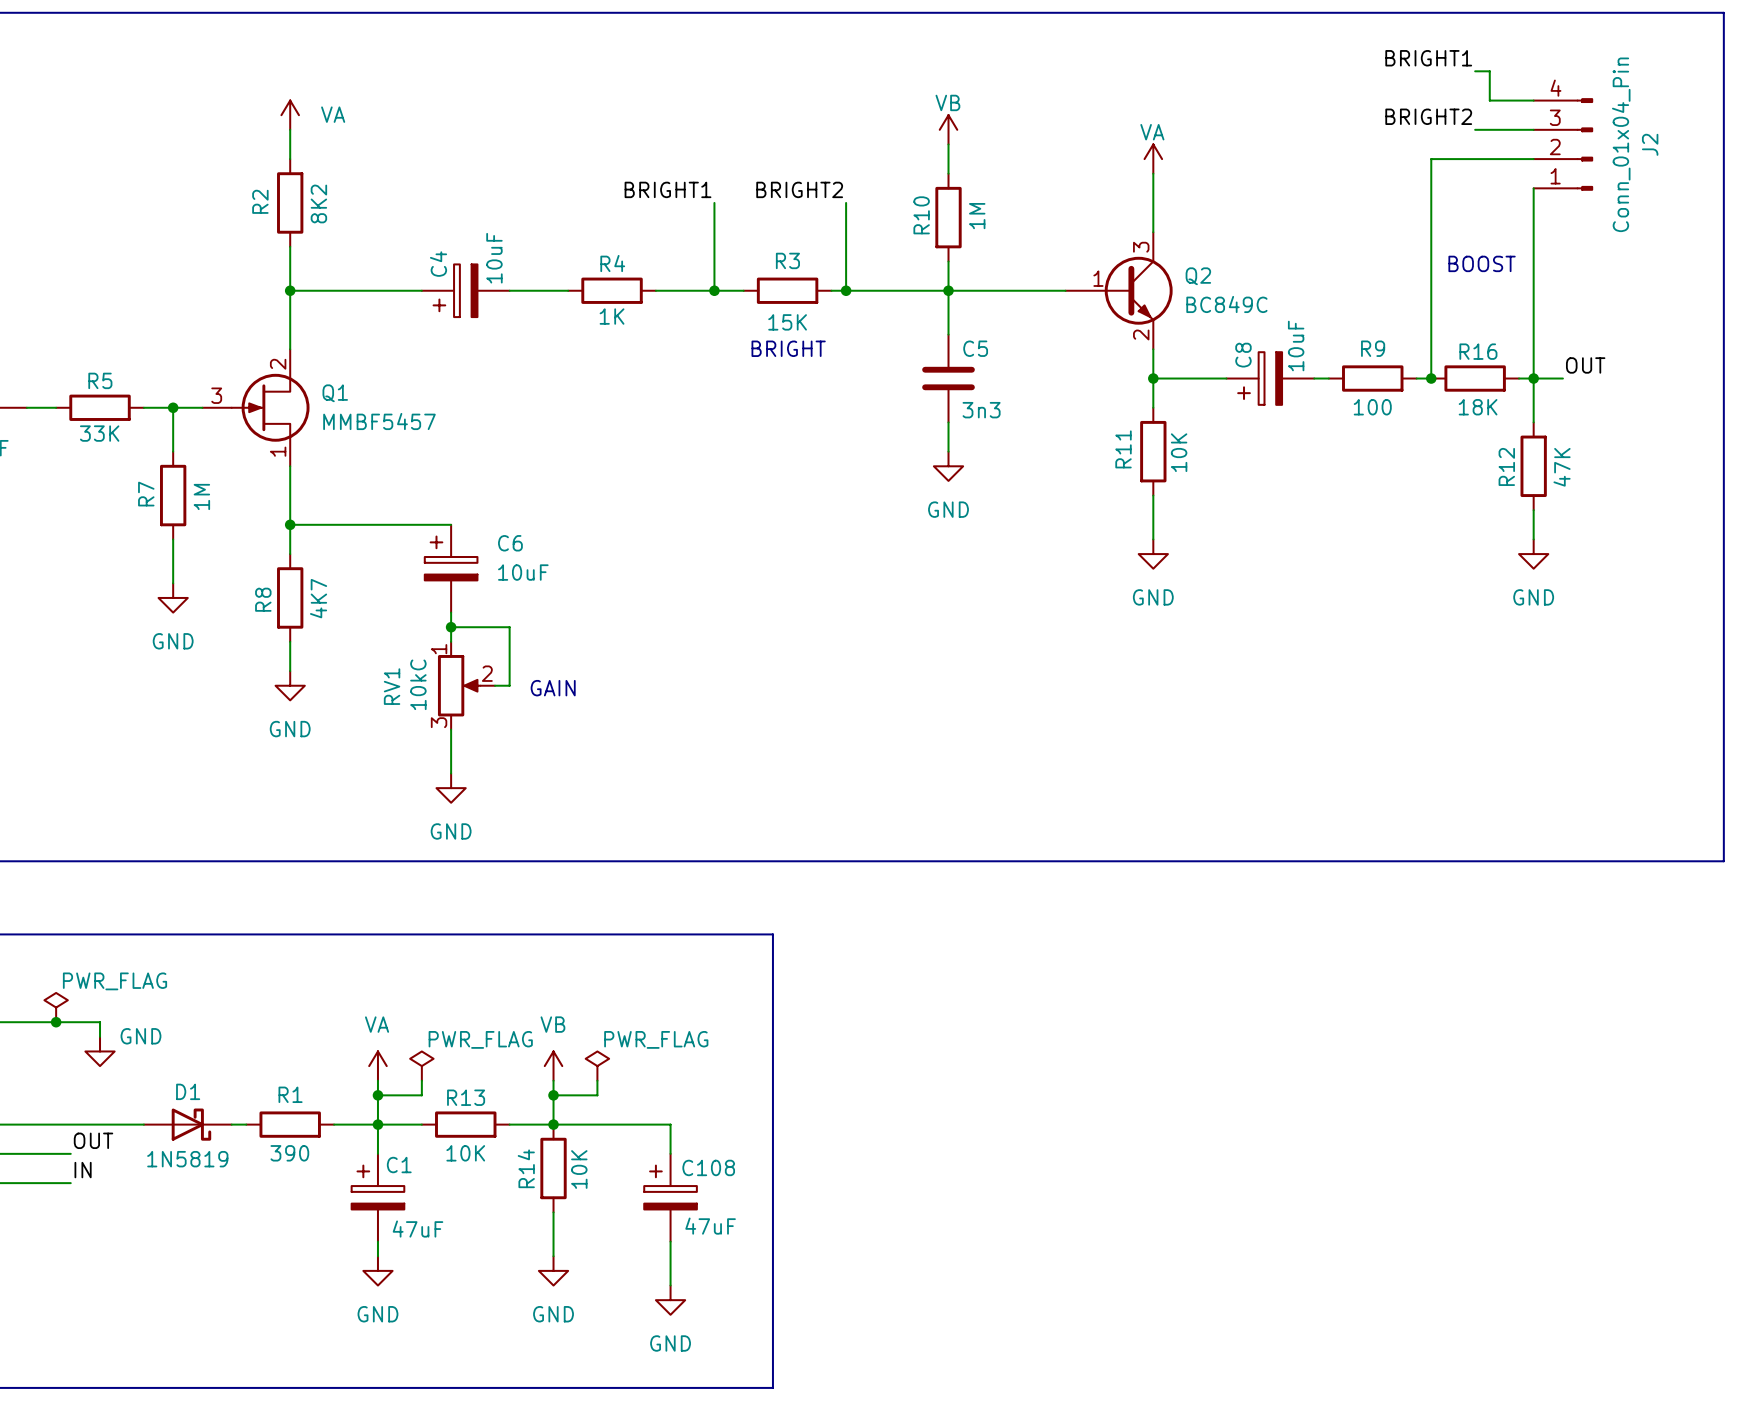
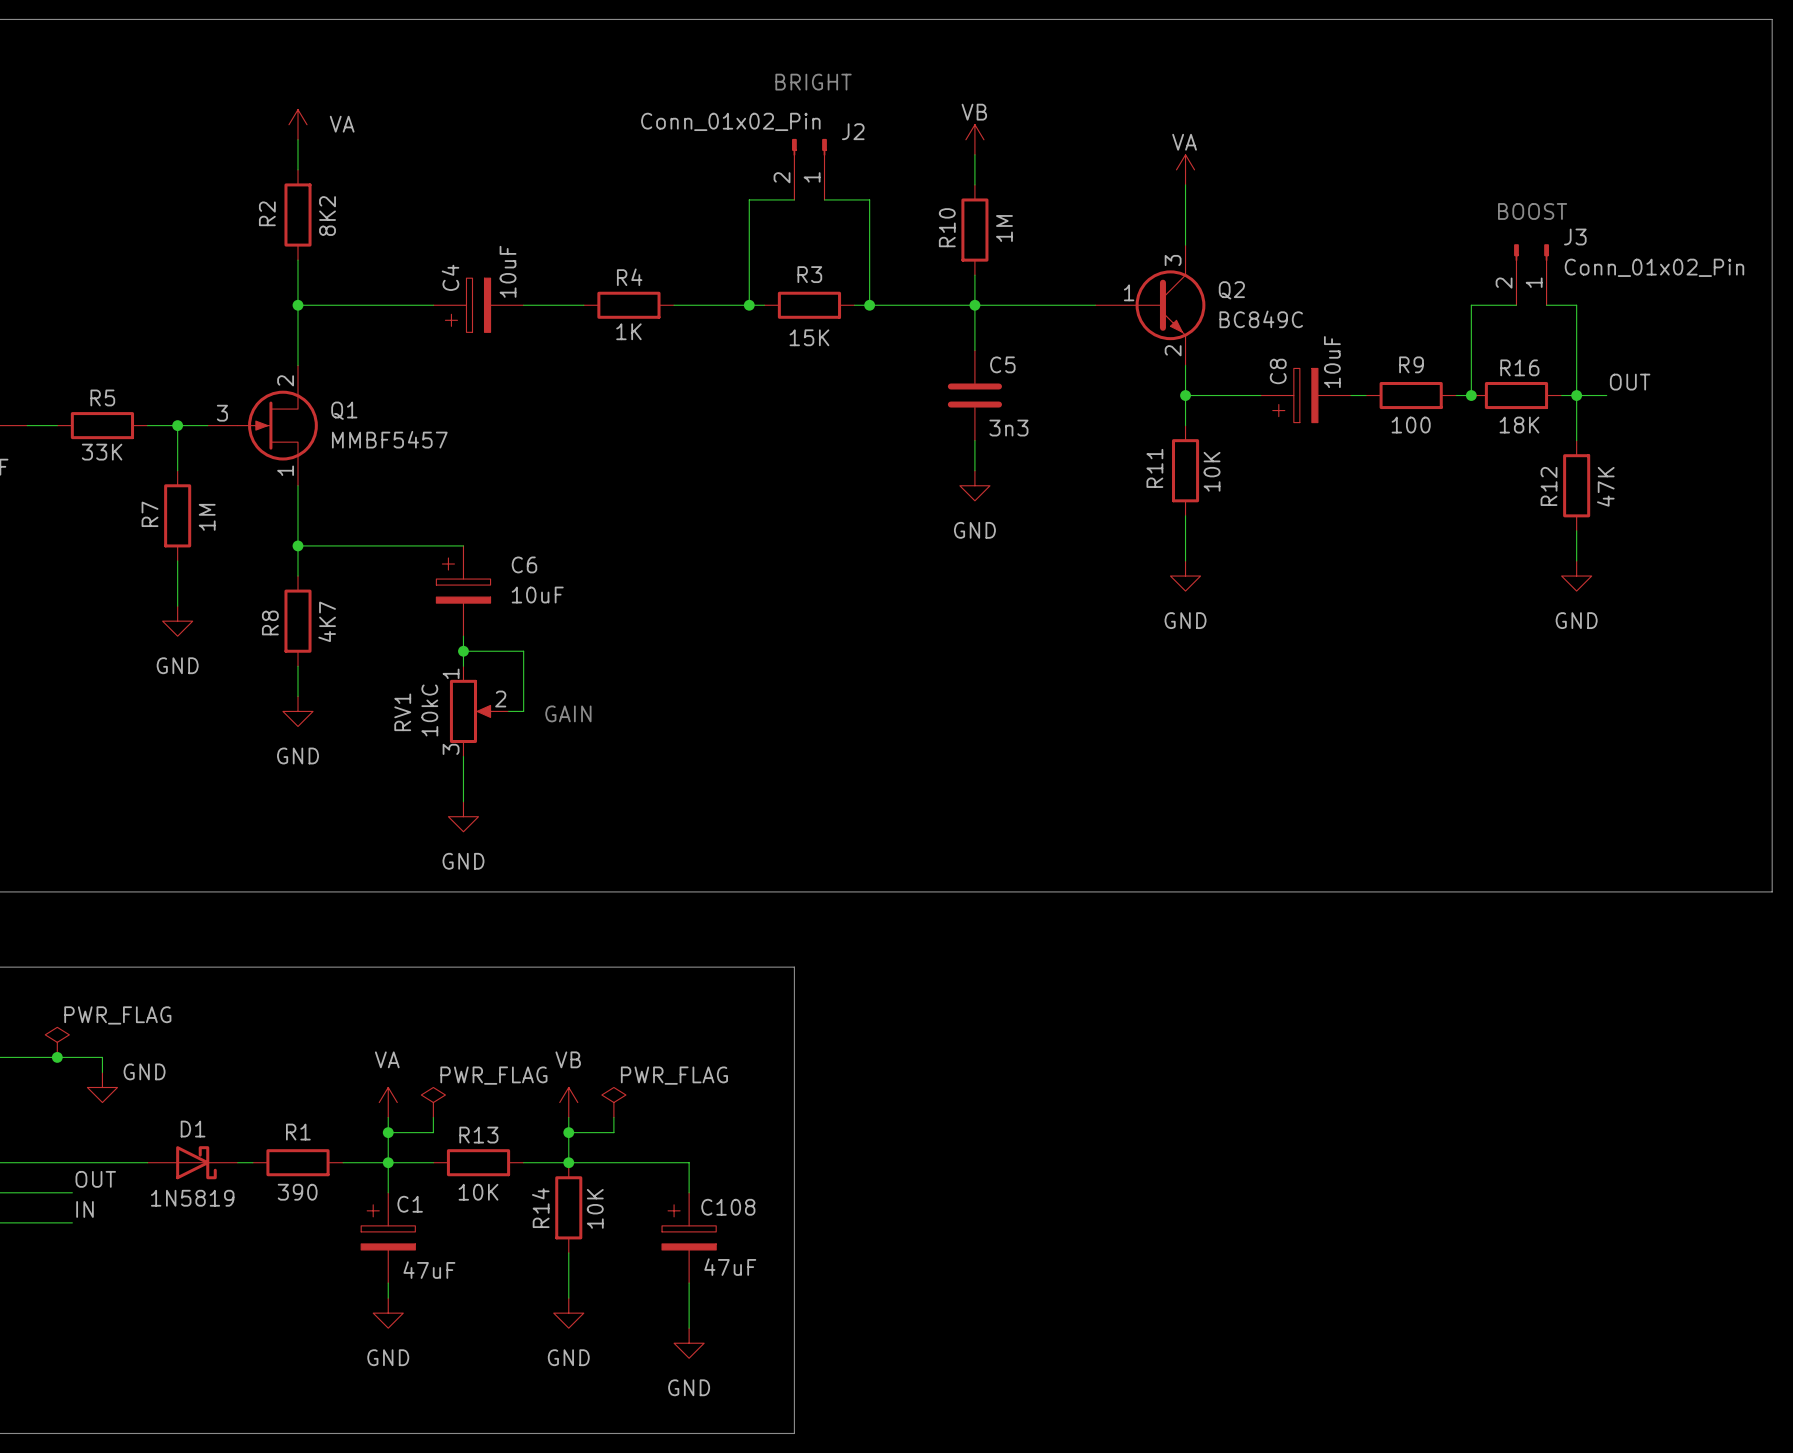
label: BRIGHT1 (1428, 58) -> none
wire: (1475, 71) (1489, 71) (1489, 100) (1533, 100) -> none
J2 symbol: [1533, 98, 1594, 191] -> [792, 138, 827, 200]
label: BRIGHT2 (1428, 116) -> none
wire: (1475, 129) (1533, 129) -> none
J2 value: Conn_01x04_Pin (1621, 144) -> Conn_01x02_Pin (730, 121)
J2 name position: J2 (1650, 144) -> J2 (853, 131)
wire: (1533, 159) (1431, 159) (1431, 290) -> (1516, 305) (1471, 305)
wire: none -> (794, 199) (749, 199) (749, 305)
wire: none -> (824, 199) (869, 199) (869, 215)
wire: (1533, 188) (1533, 290) -> (1546, 305) (1576, 305)
label: BRIGHT1 (668, 189) -> none
label: BRIGHT2 (799, 189) -> none
wire: (714, 202) (714, 290) -> none
J3: none -> Conn_01x02_Pin (1531, 274)
text position: BOOST (1482, 263) -> BOOST (1532, 211)
junction position: (714, 290) -> (749, 305)
text position: BRIGHT (788, 348) -> BRIGHT (813, 82)

